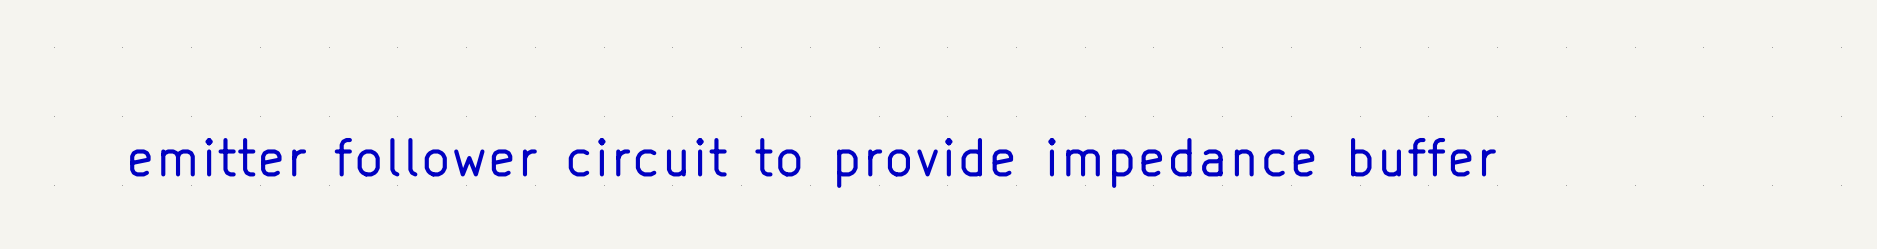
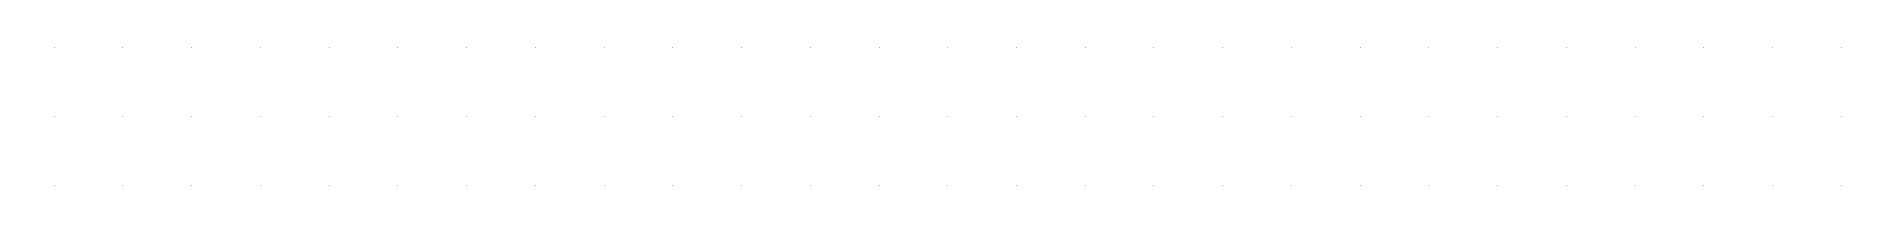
text: emitter follower circuit to provide impedance buffer (813, 162) -> none

